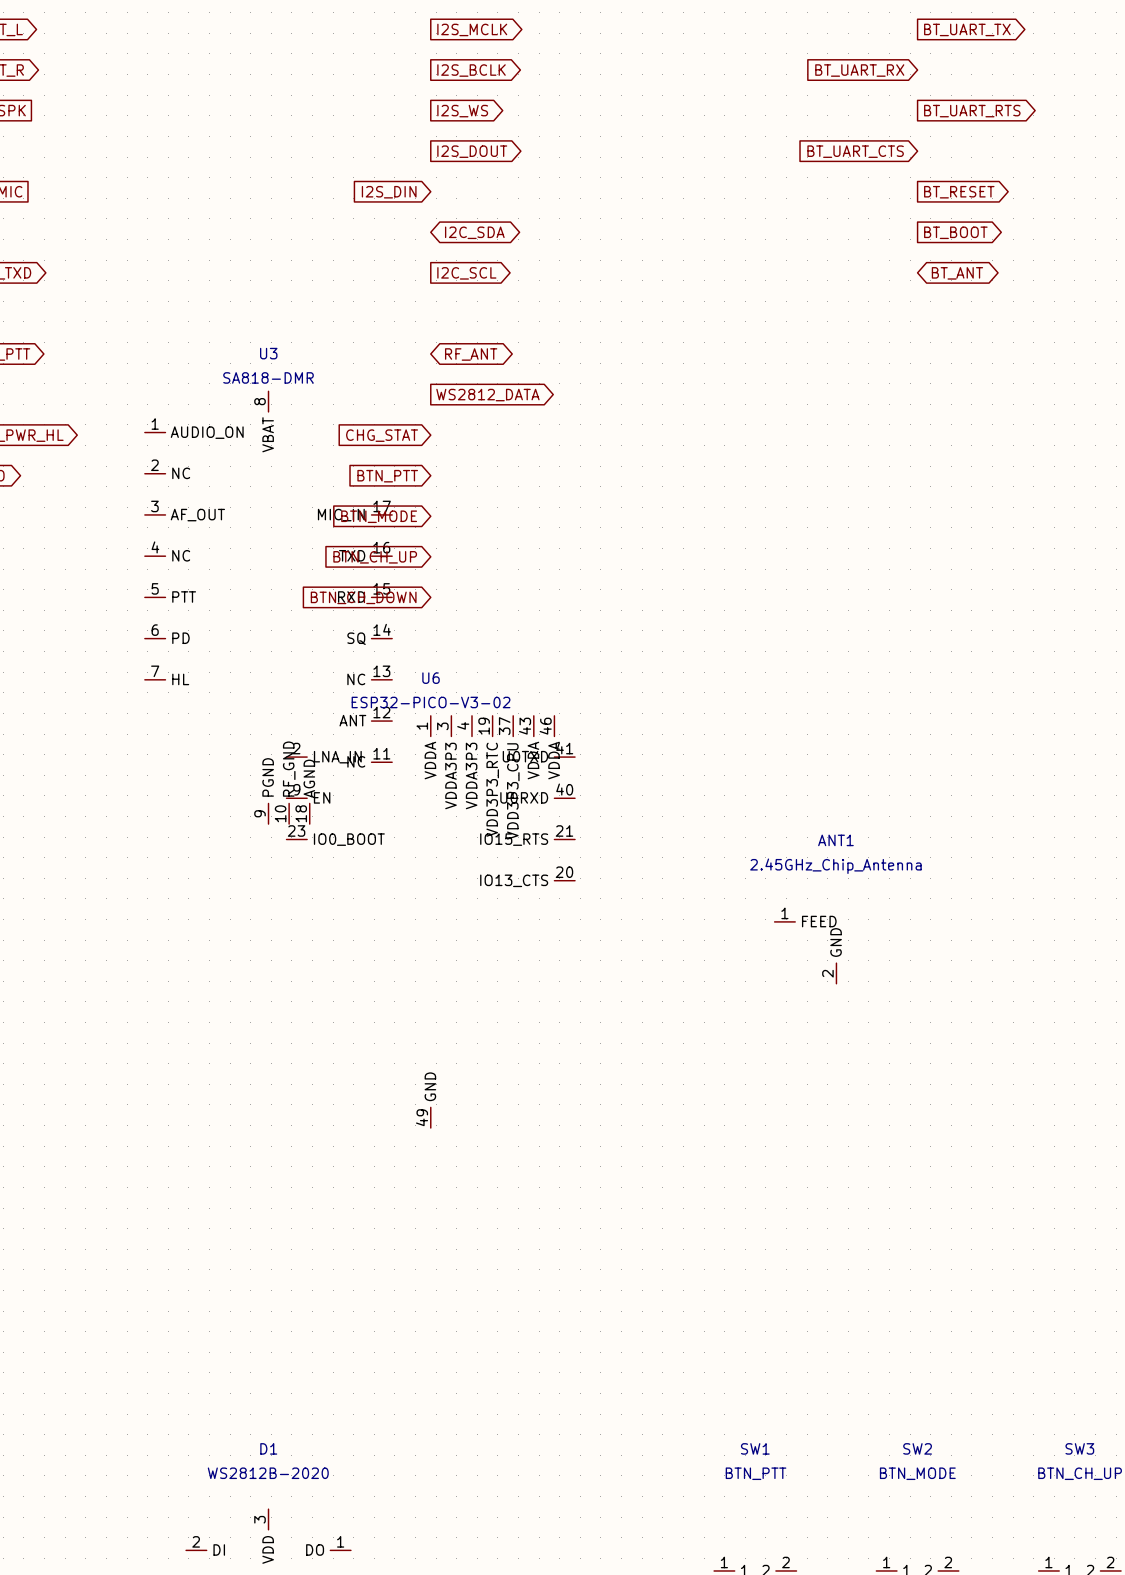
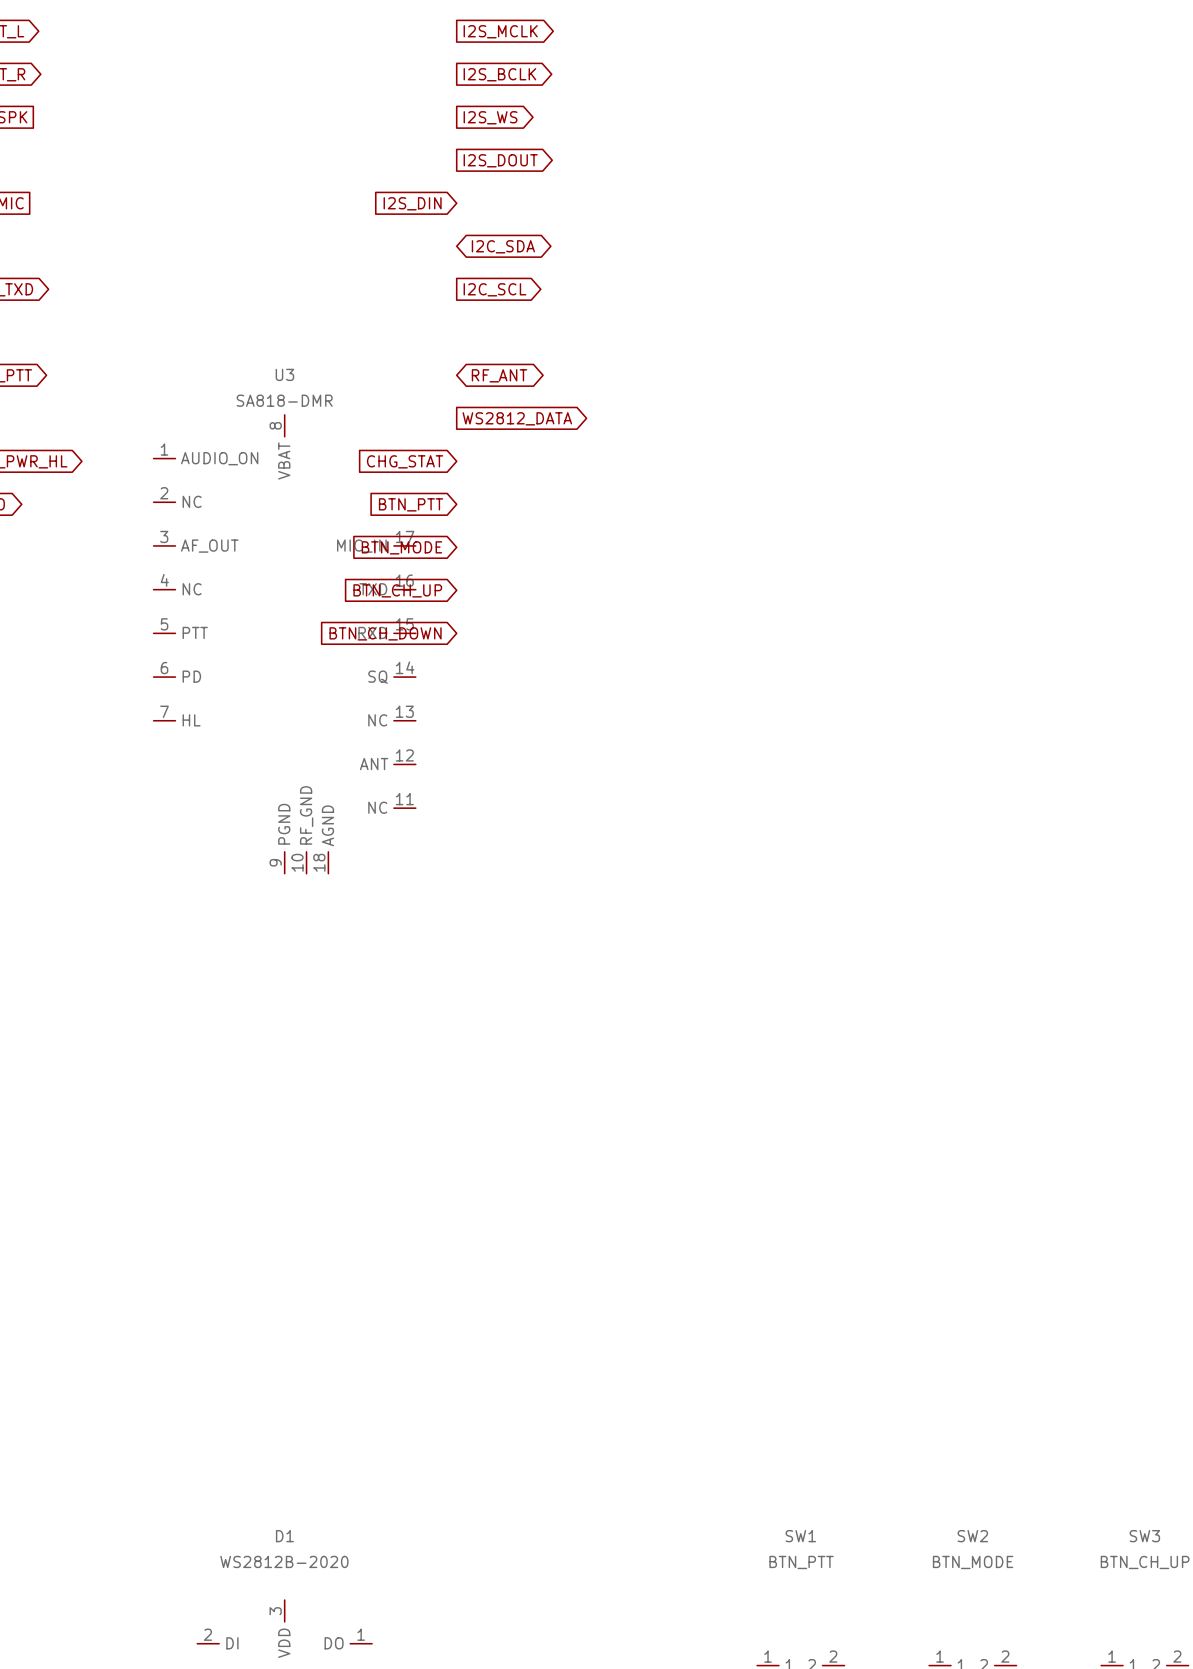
global label: BT_UART_TX (967, 29) -> none
global label: BT_UART_RX (859, 70) -> none
global label: BT_UART_RTS (972, 111) -> none
global label: BT_UART_CTS (855, 151) -> none
global label: BT_RESET (959, 192) -> none
global label: BT_BOOT (955, 232) -> none
global label: BT_ANT (957, 273) -> none
U6: ESP32-PICO-V3-02 (430, 921) -> none
ANT1: 2.45GHz_Chip_Antenna (805, 952) -> none

